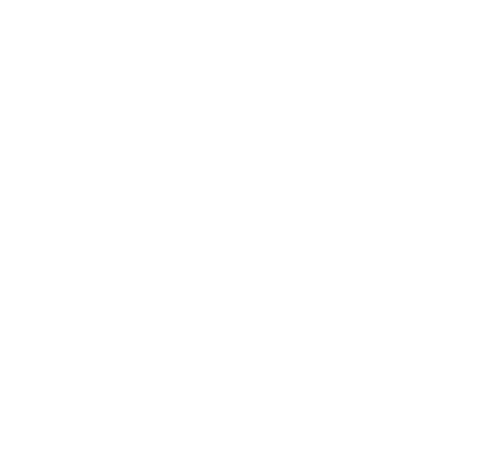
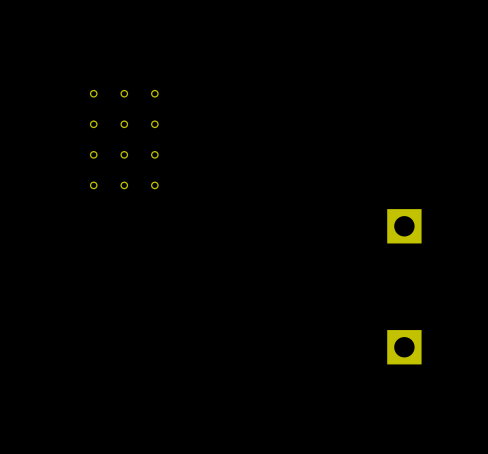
part: none -> (124, 139)
part: none -> (404, 226)
part: none -> (404, 347)

